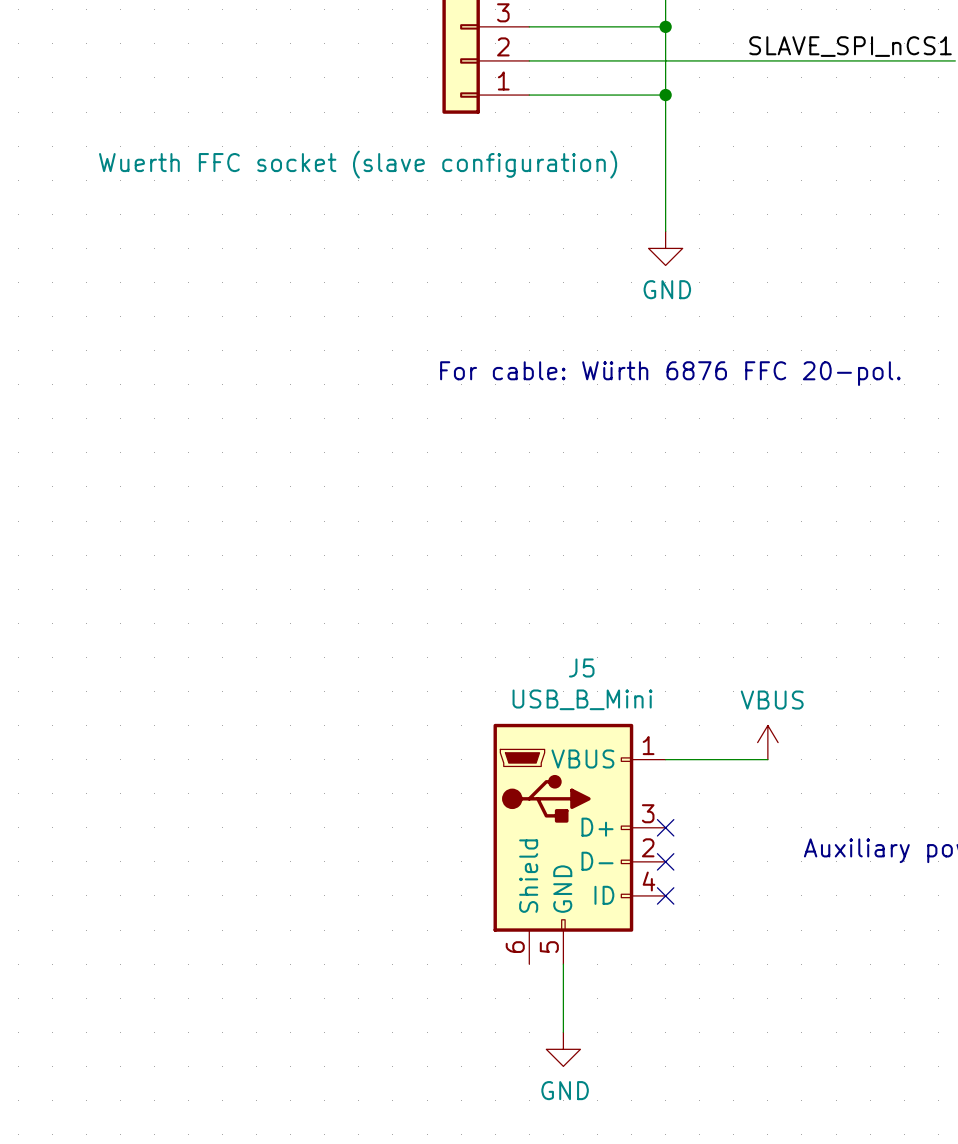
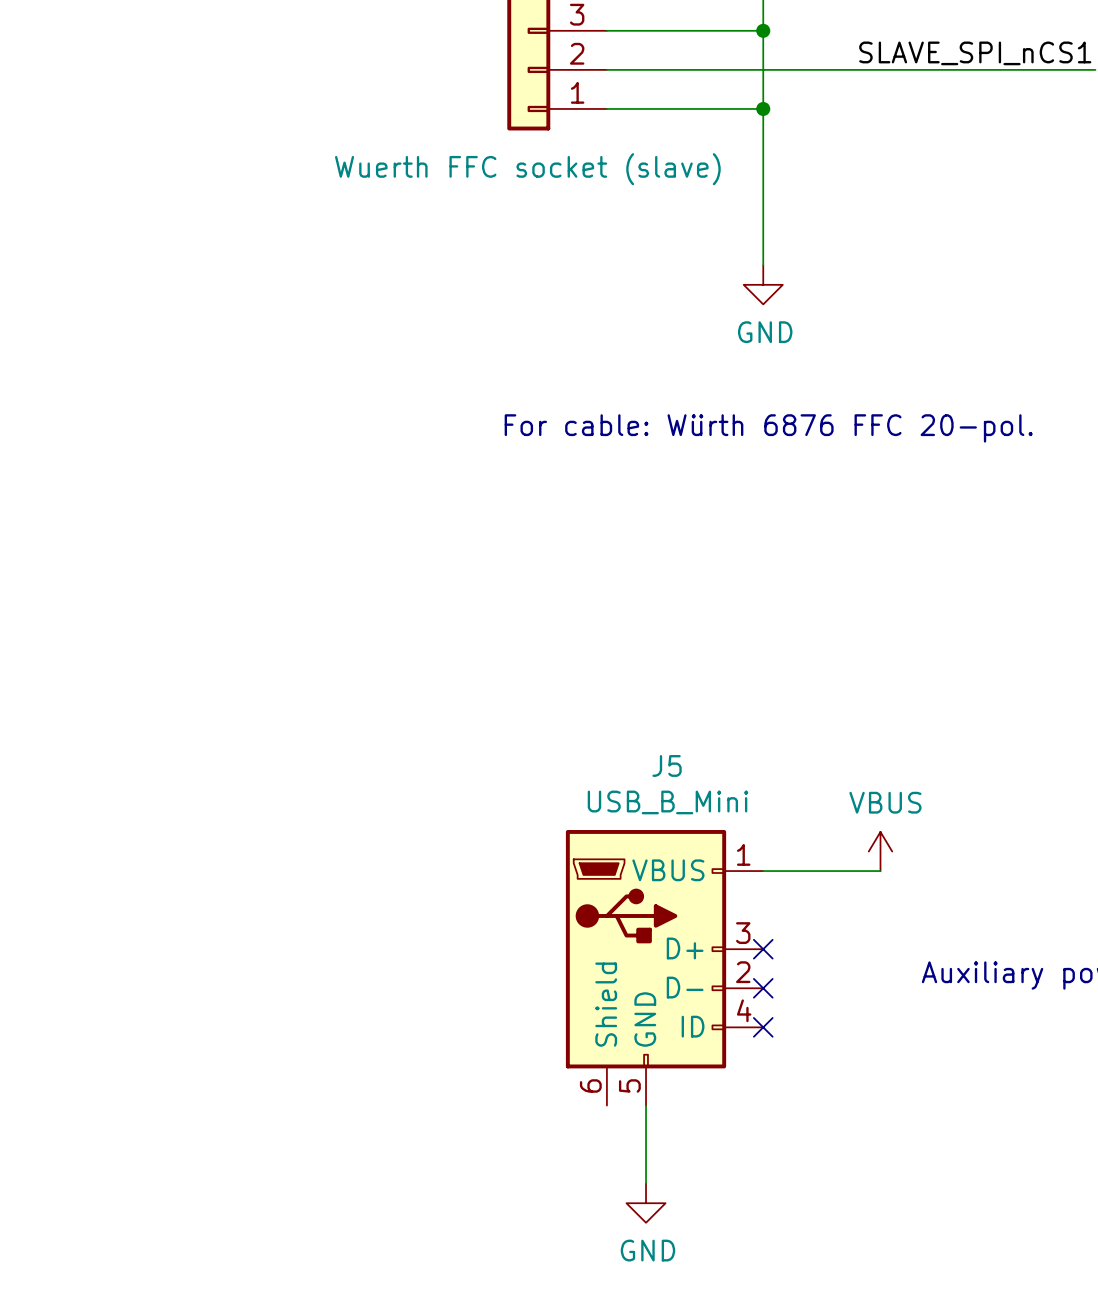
part value: Wuerth FFC socket (slave configuration) (358, 164) -> Wuerth FFC socket (slave) (527, 169)

